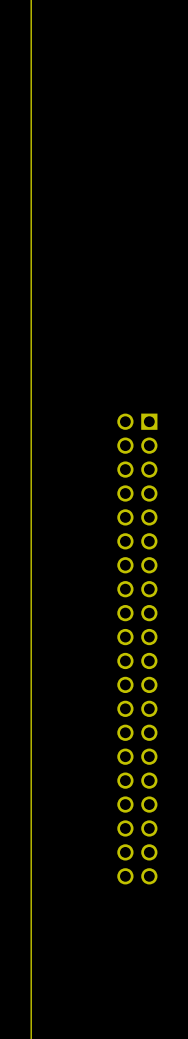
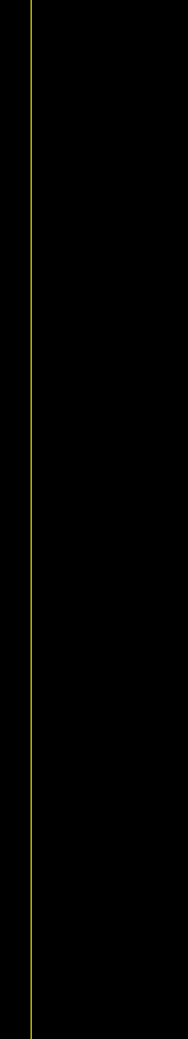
part: (137, 649) -> none

